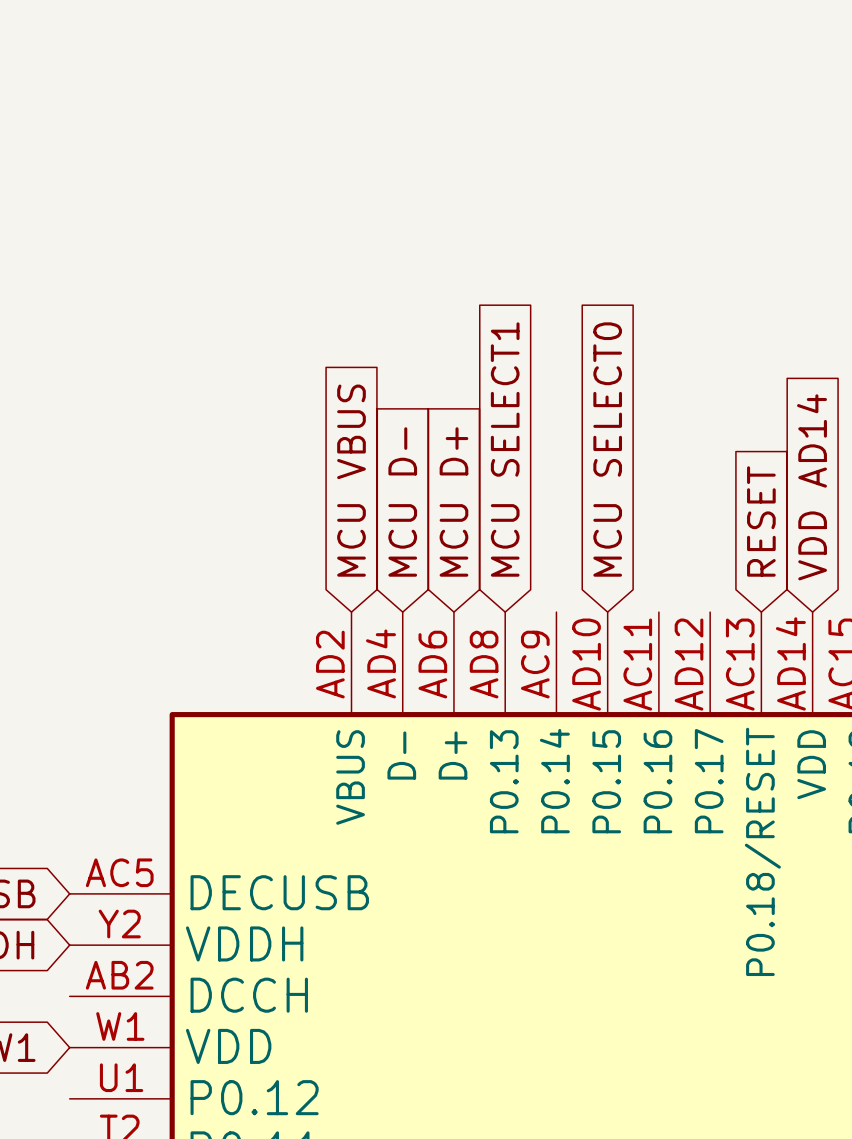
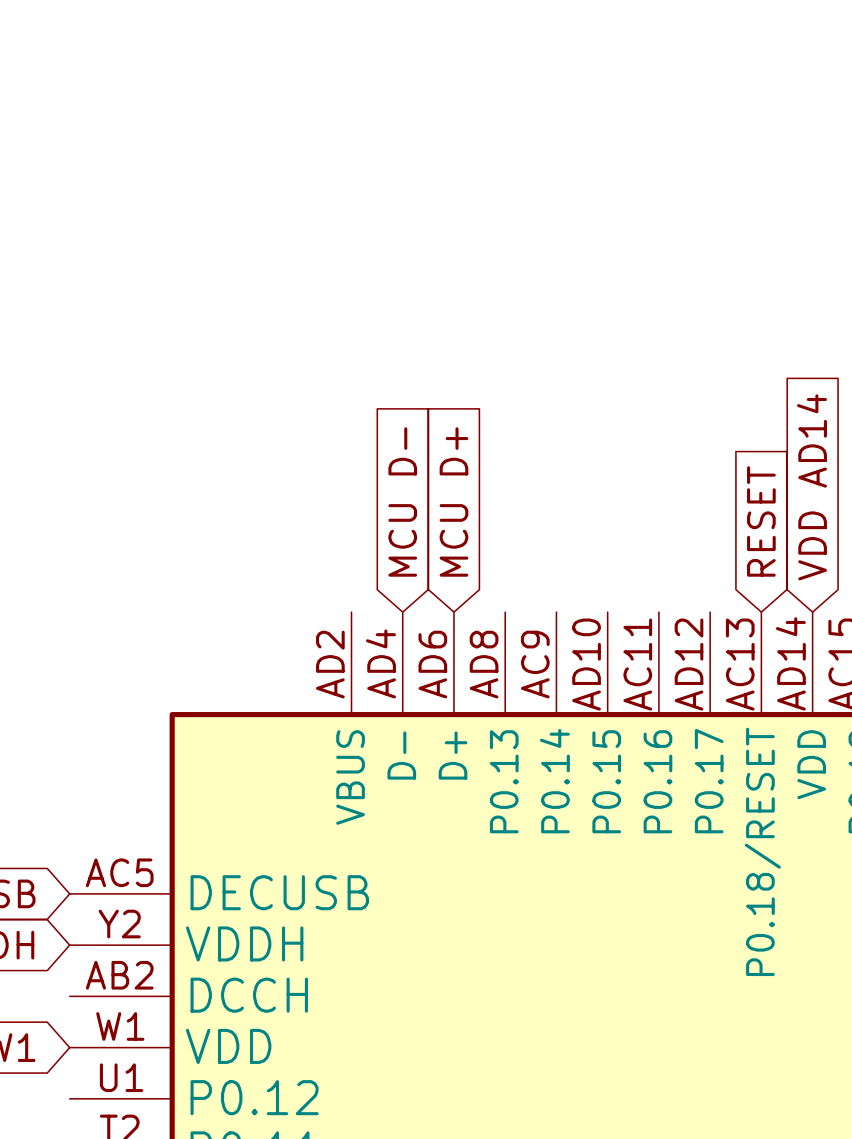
global label: MCU SELECT1 (505, 449) -> none
global label: MCU SELECT0 (607, 449) -> none
global label: MCU VBUS (351, 480) -> none

